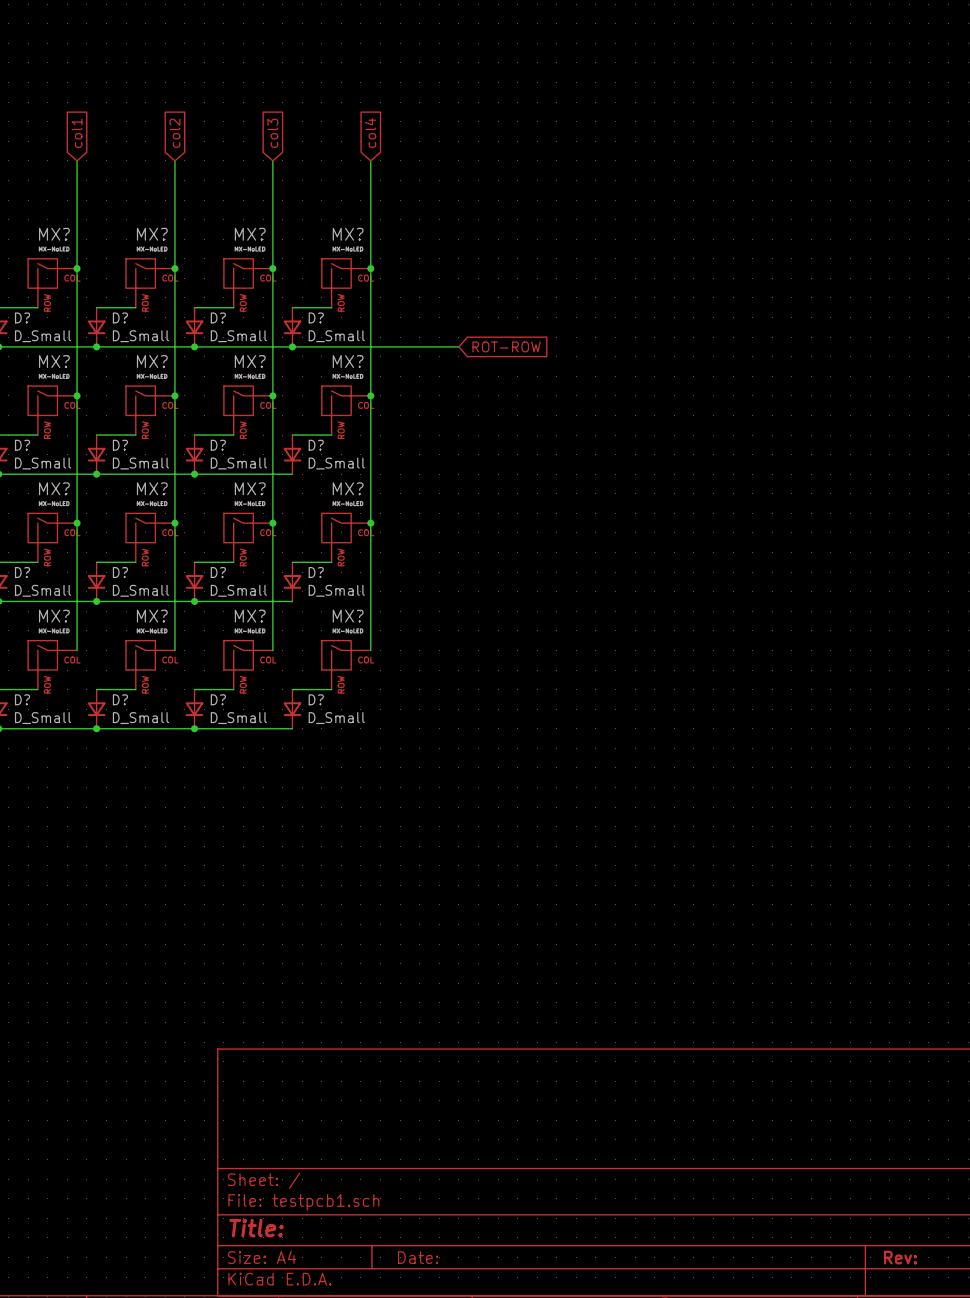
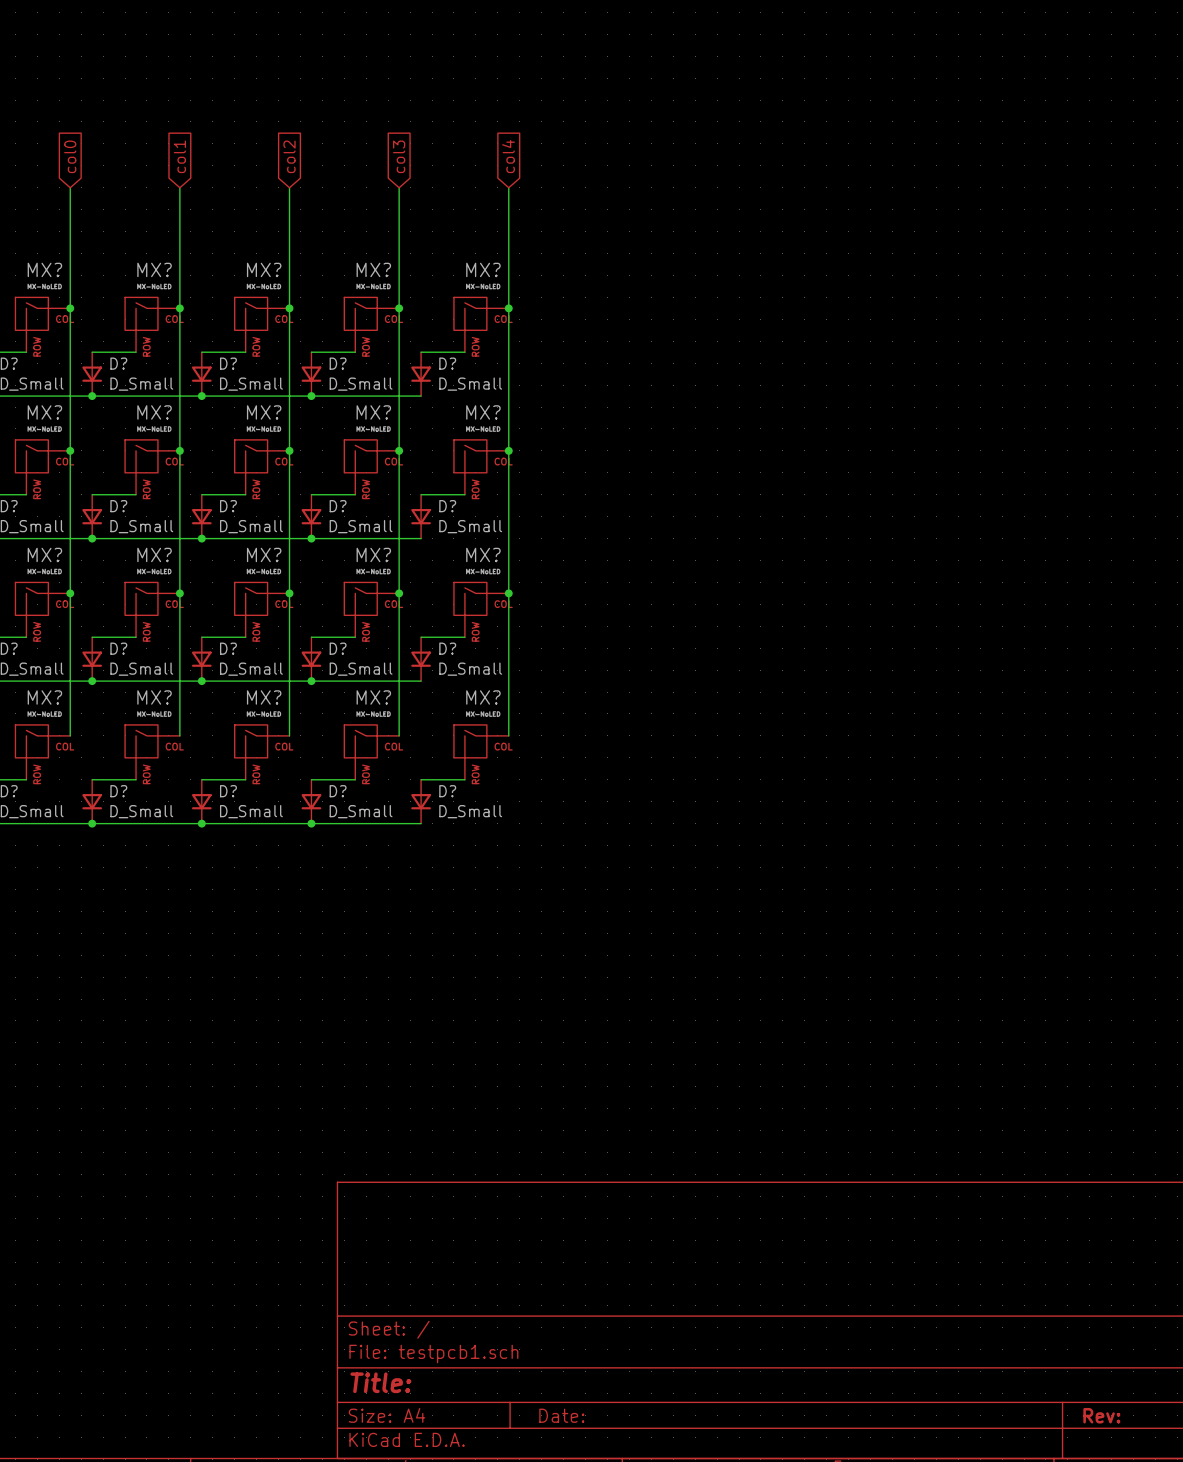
wire: (292, 346) (458, 346) -> none
junction: (292, 346) -> none
global label: ROT-ROW (506, 346) -> none

